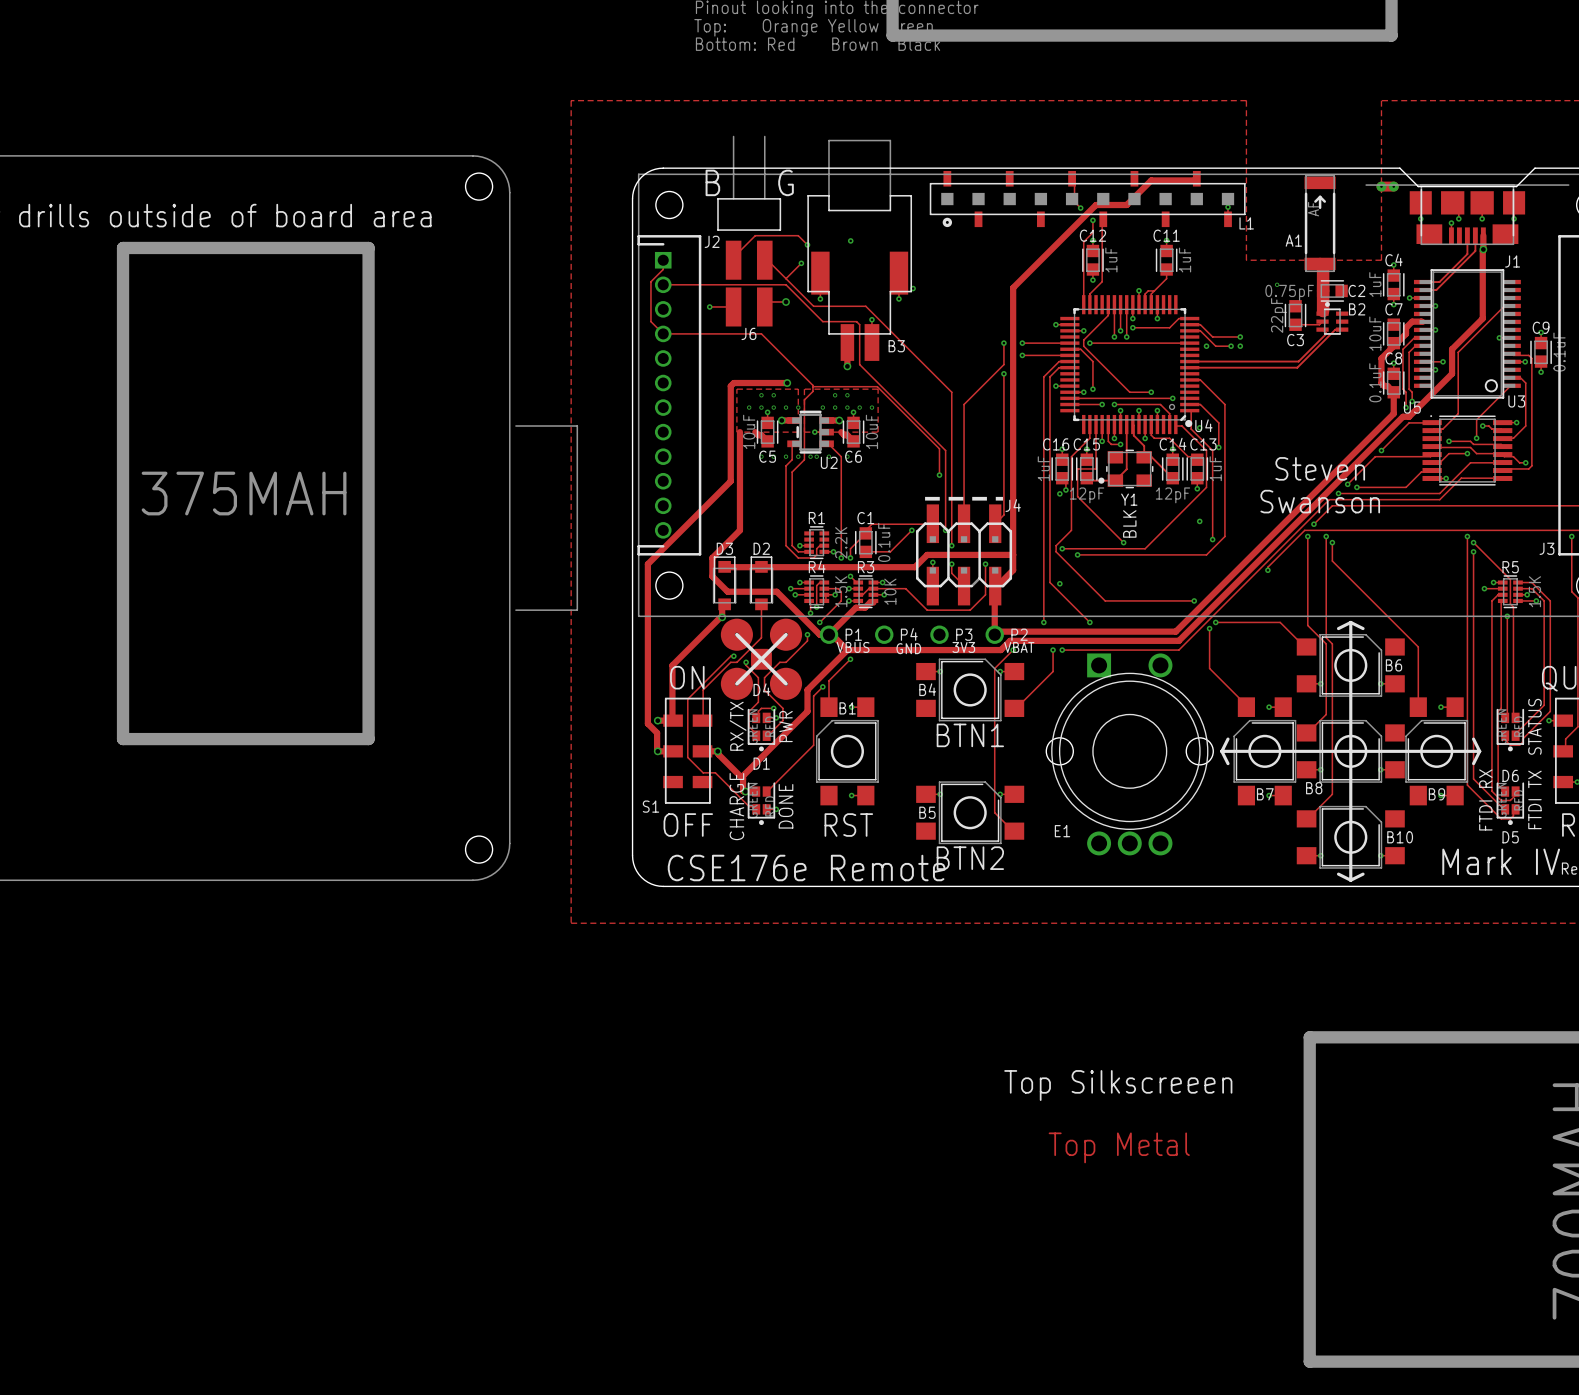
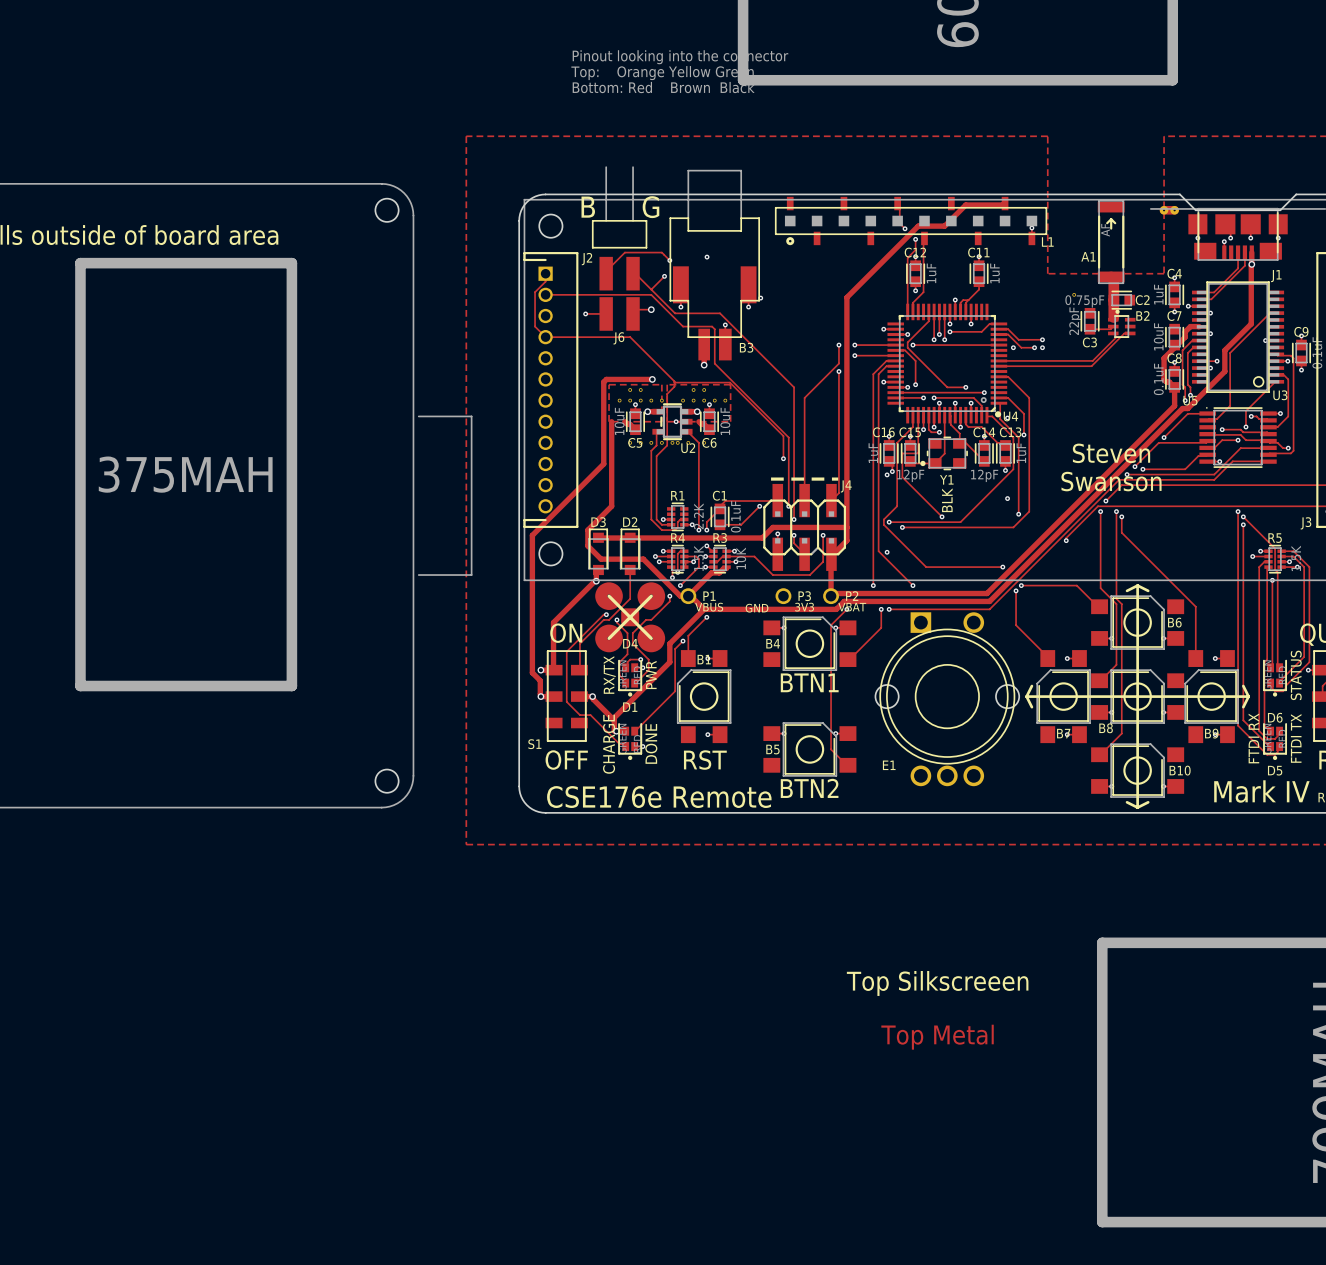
P4: (884, 634) -> none

